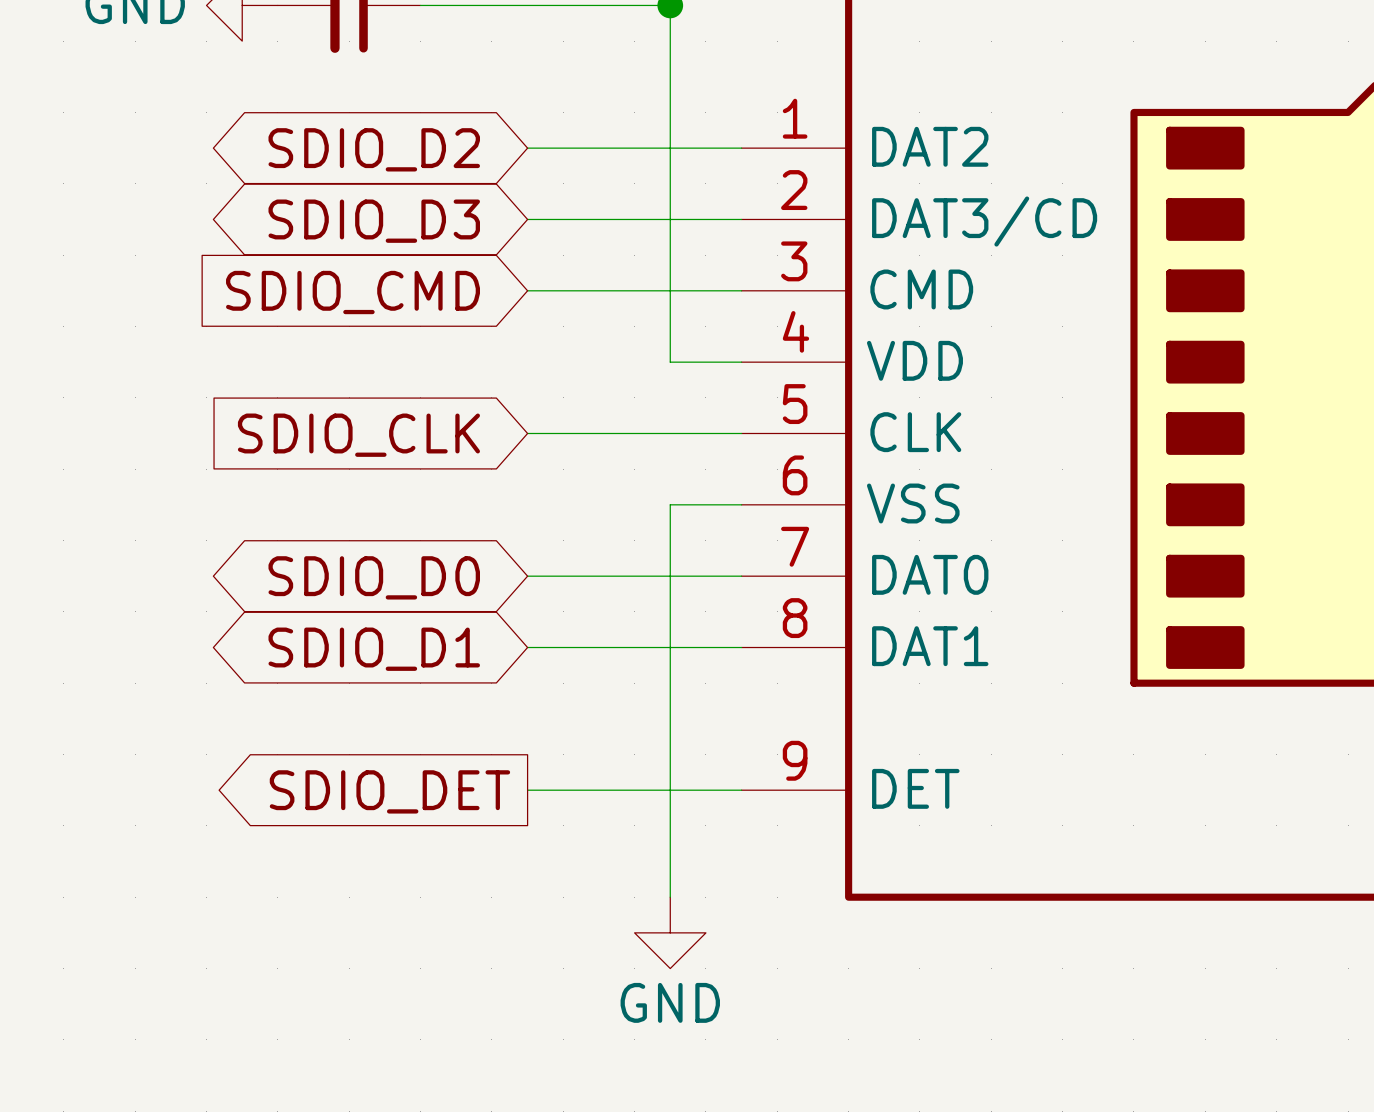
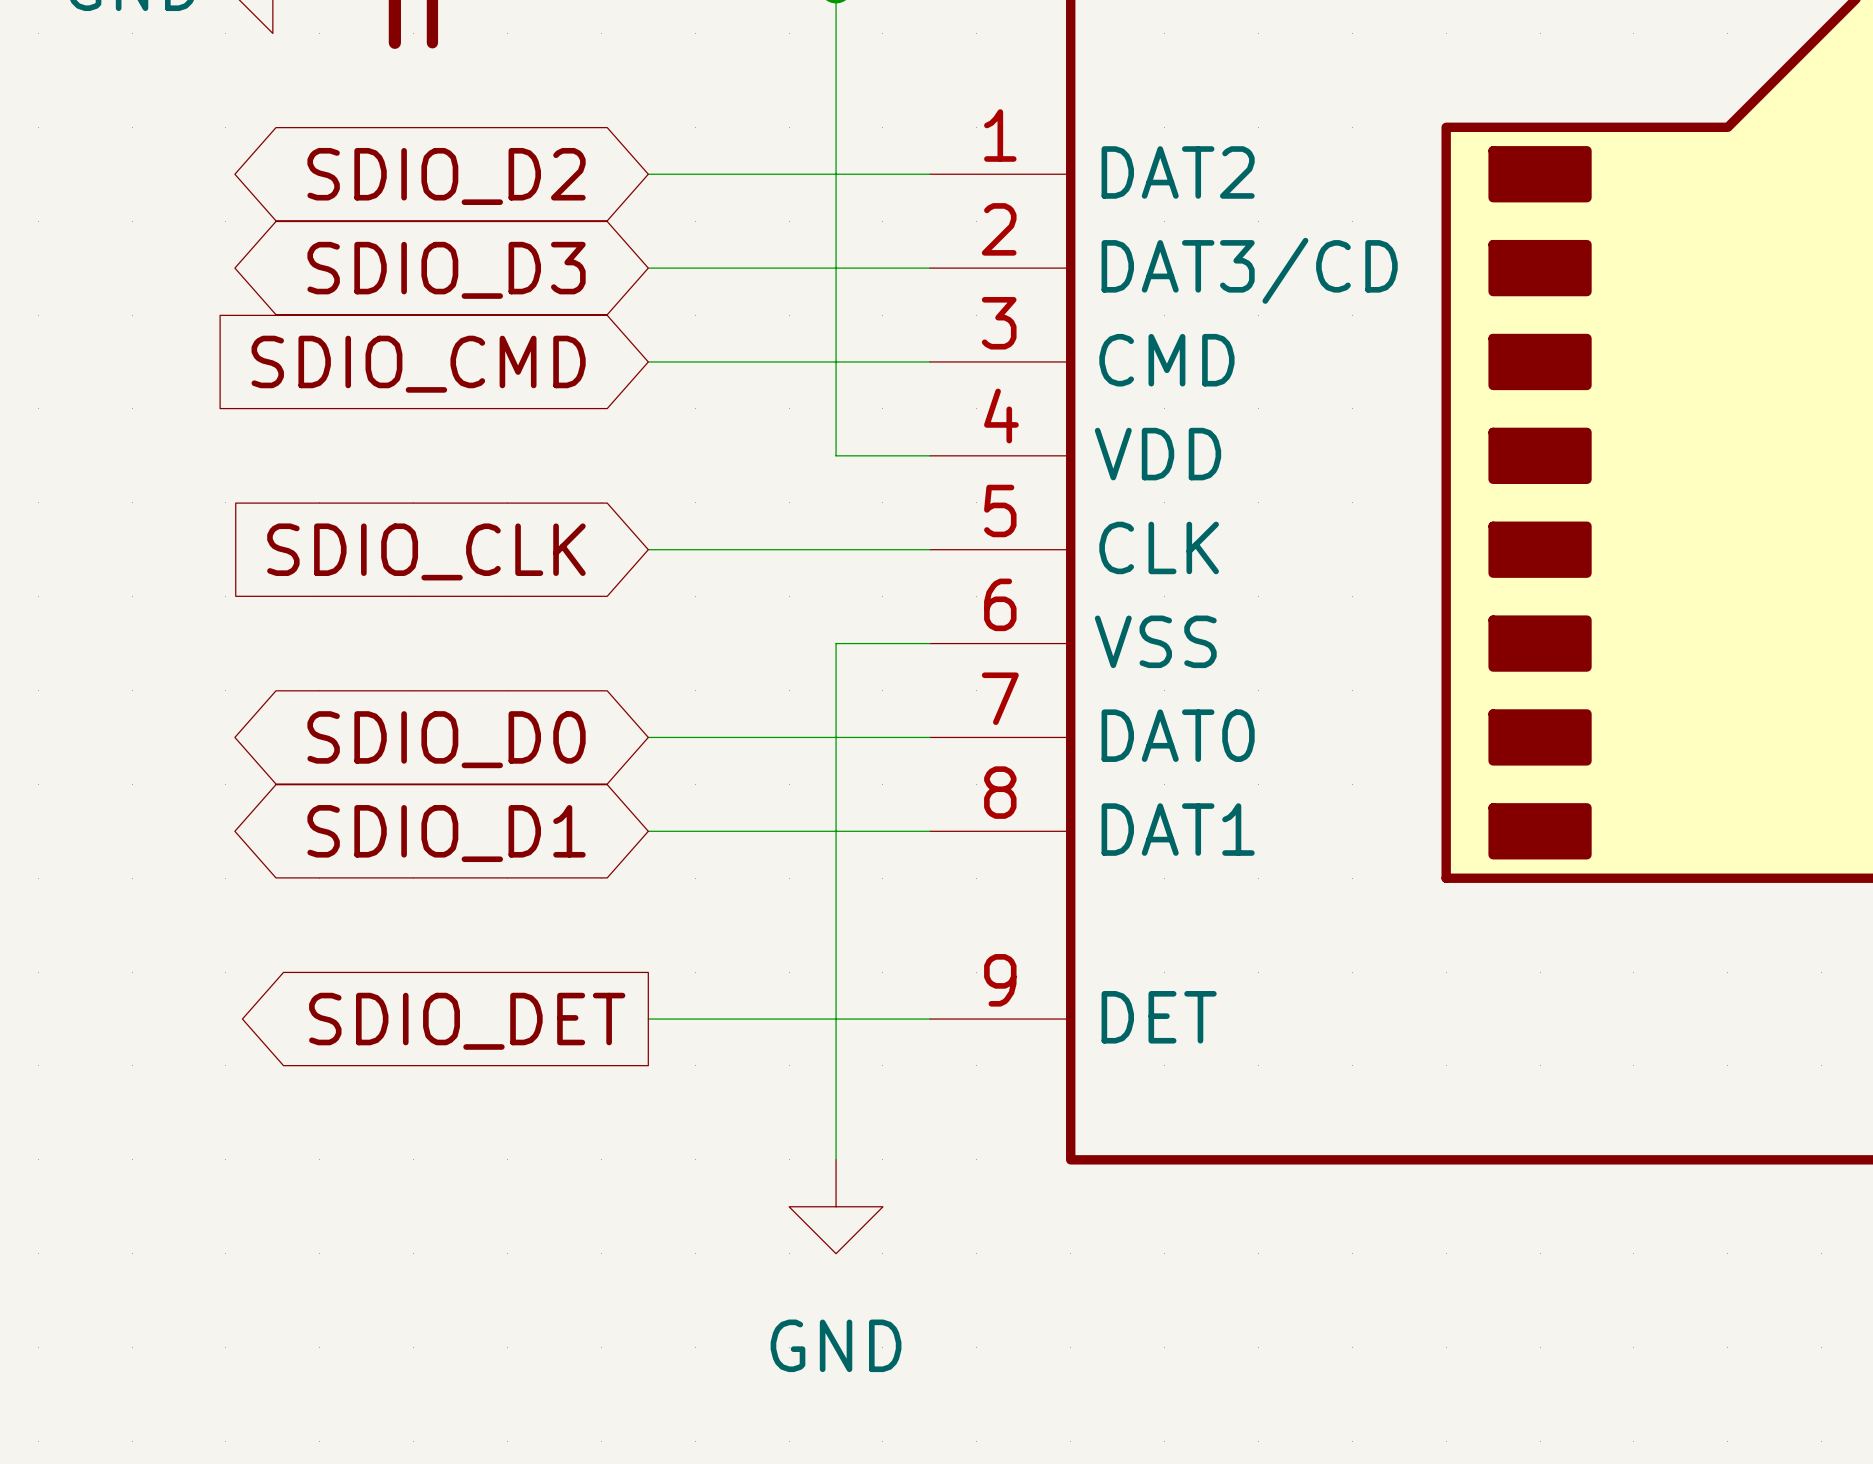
power symbol text position: GND (670, 1002) -> GND (836, 1345)

